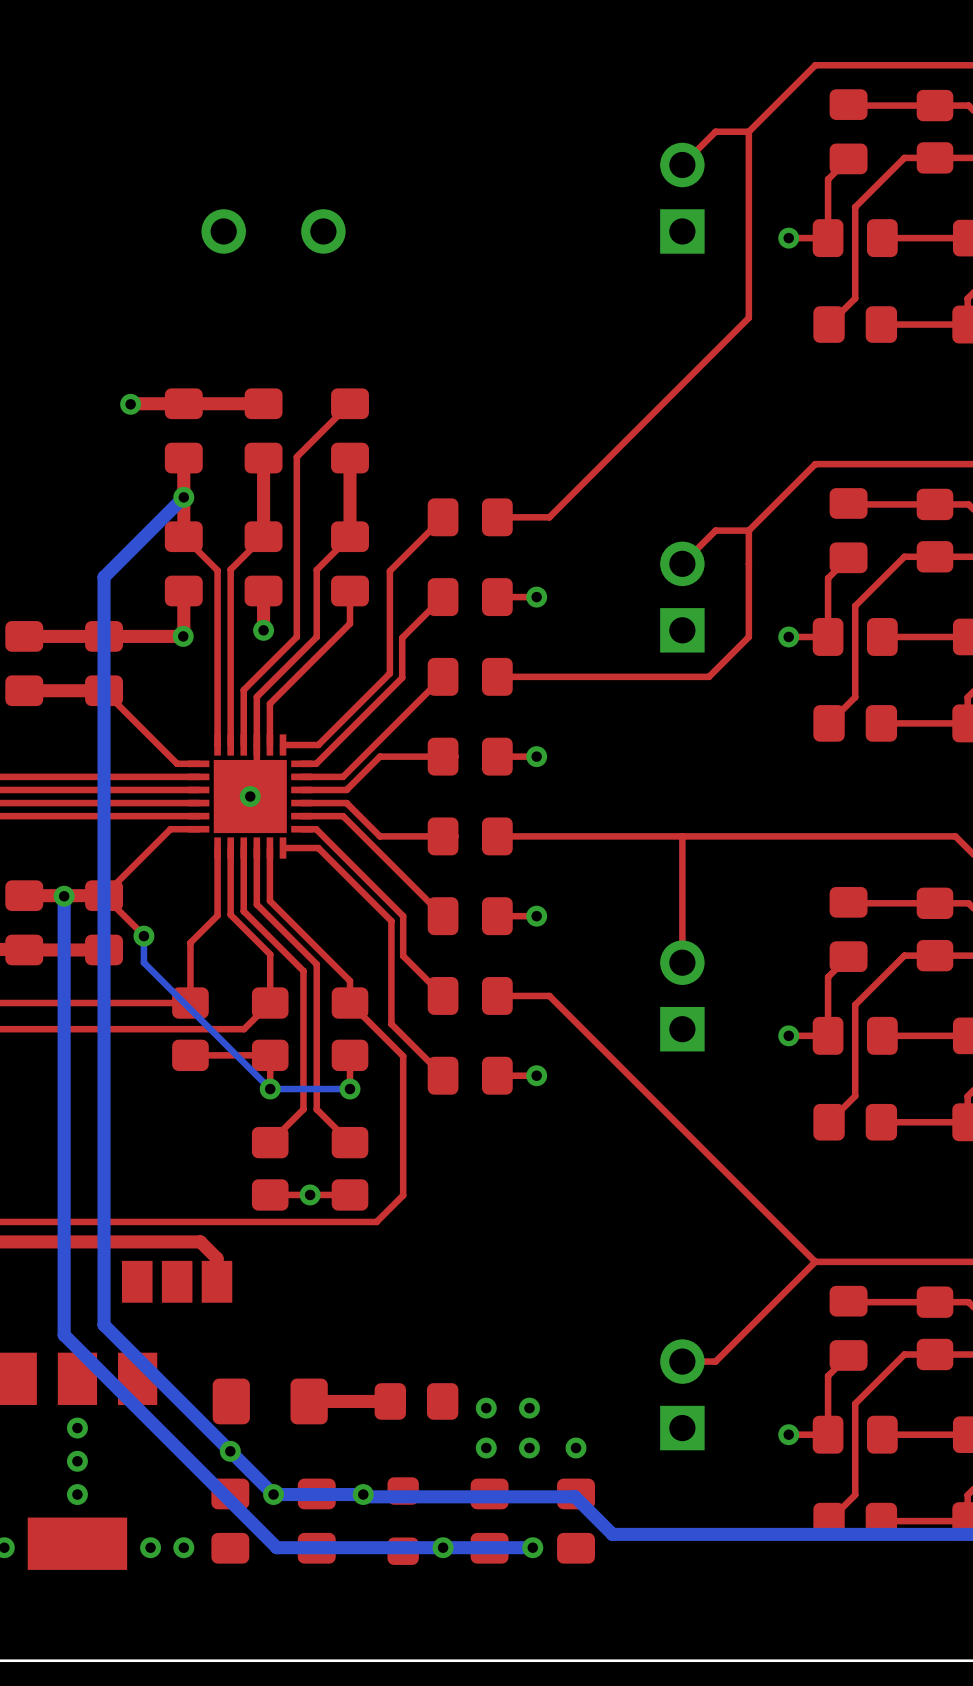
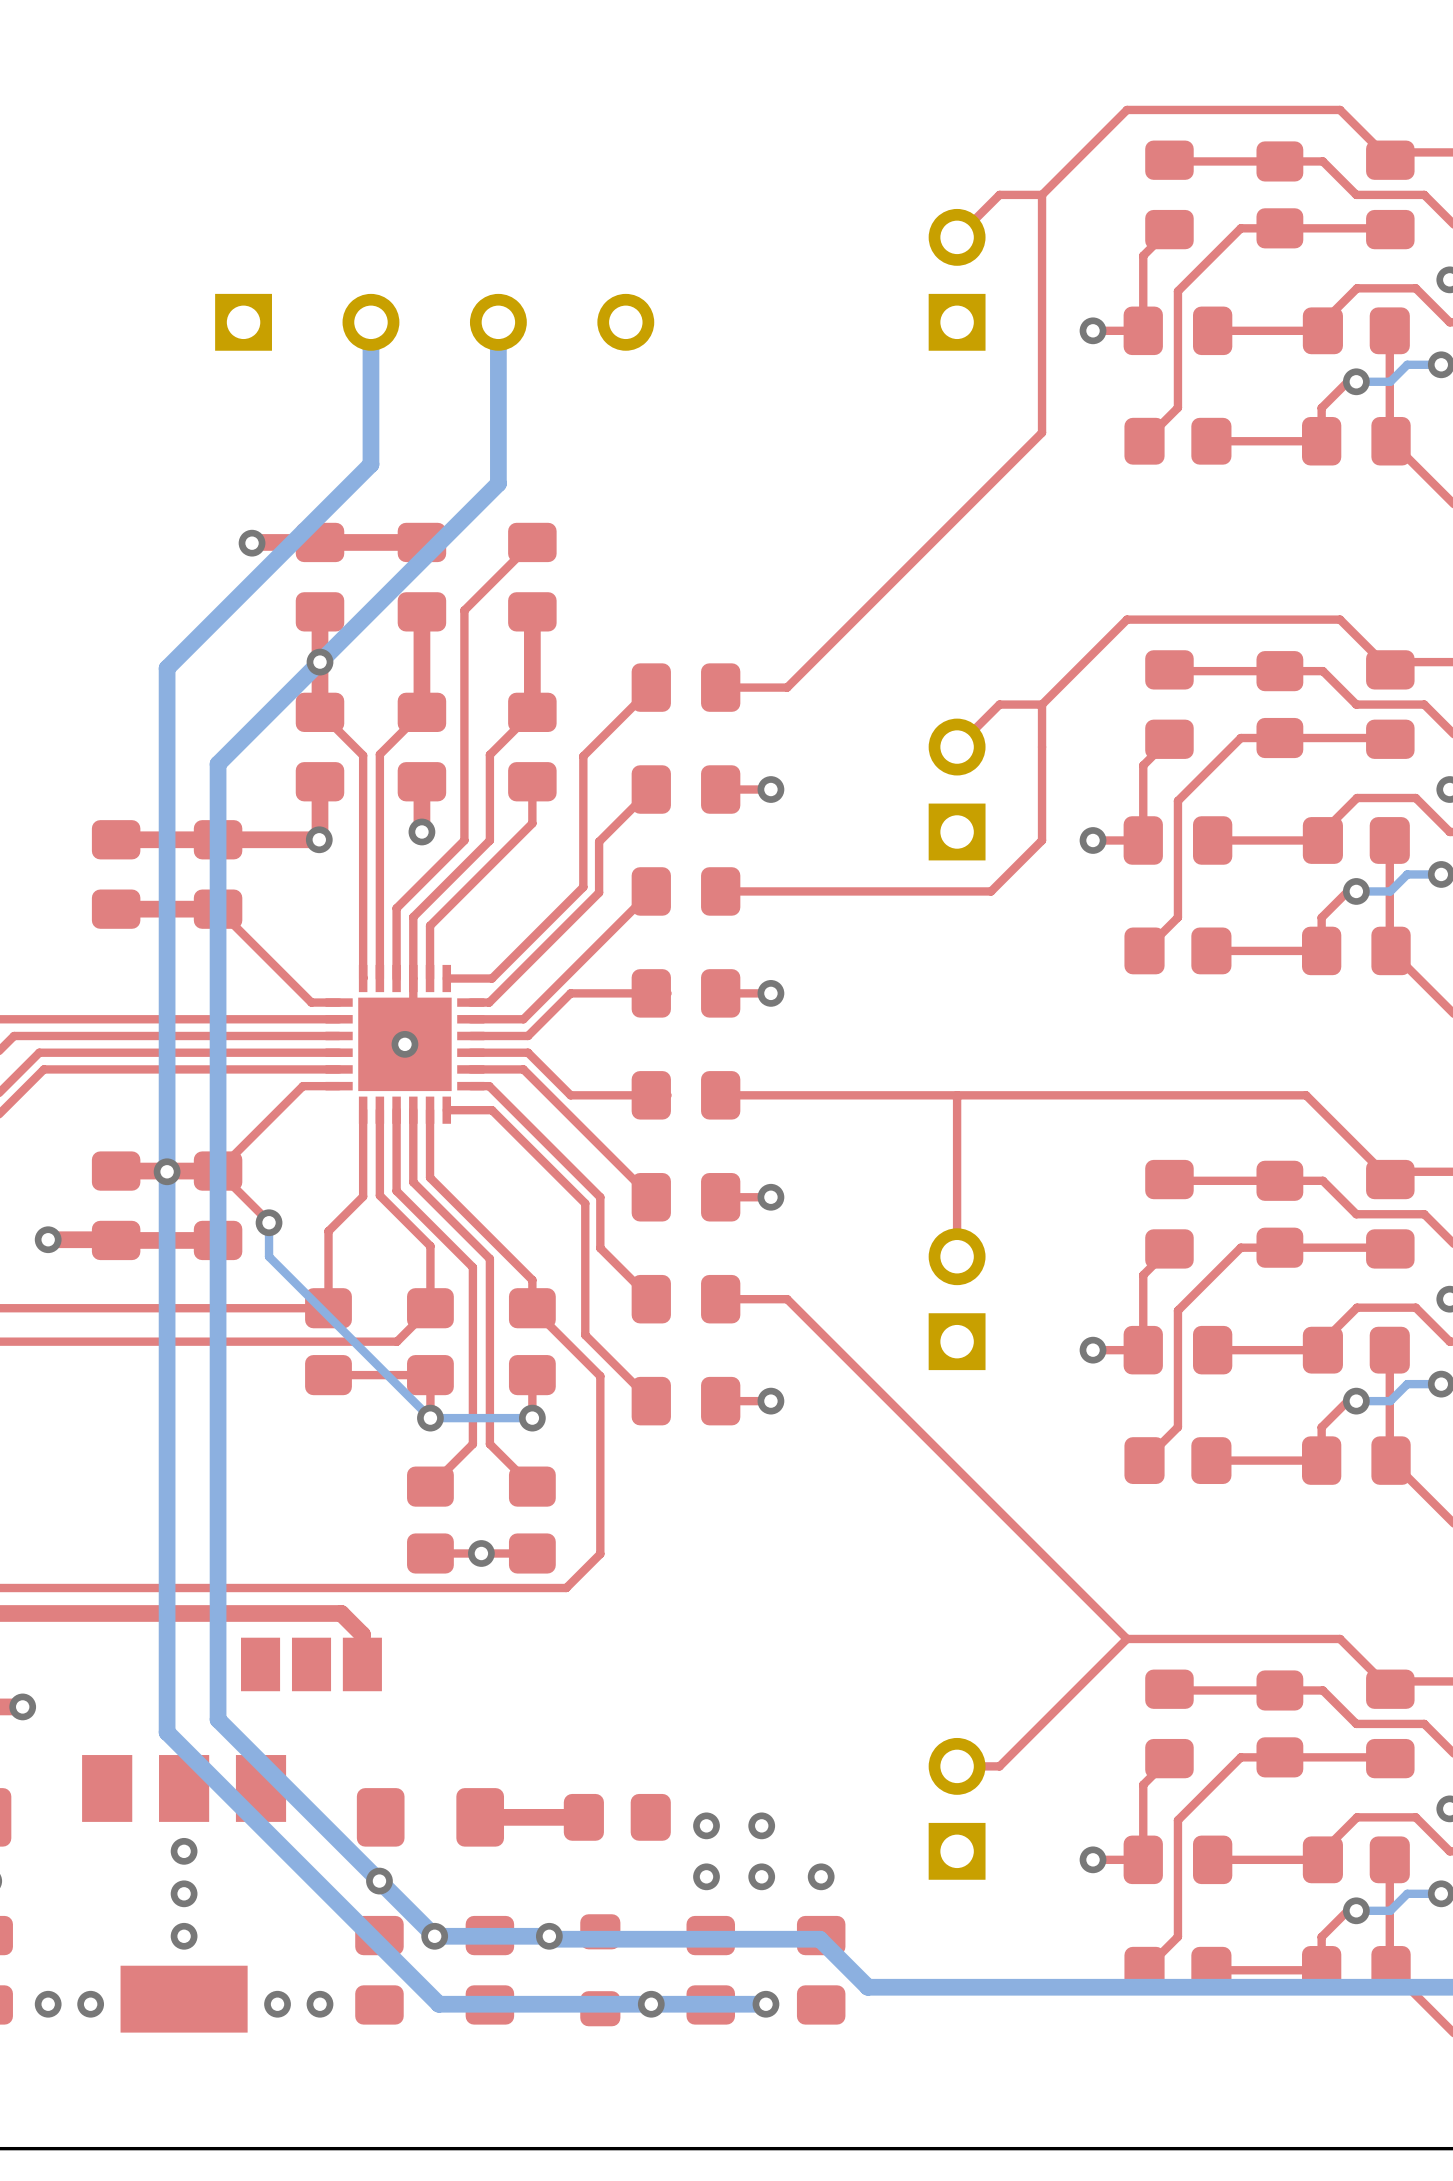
part: none -> (243, 322)
bottom track: none -> (370, 322) (370, 464) (167, 668) (167, 1171)
bottom track: none -> (498, 322) (498, 483) (320, 662)
part: none -> (625, 322)

